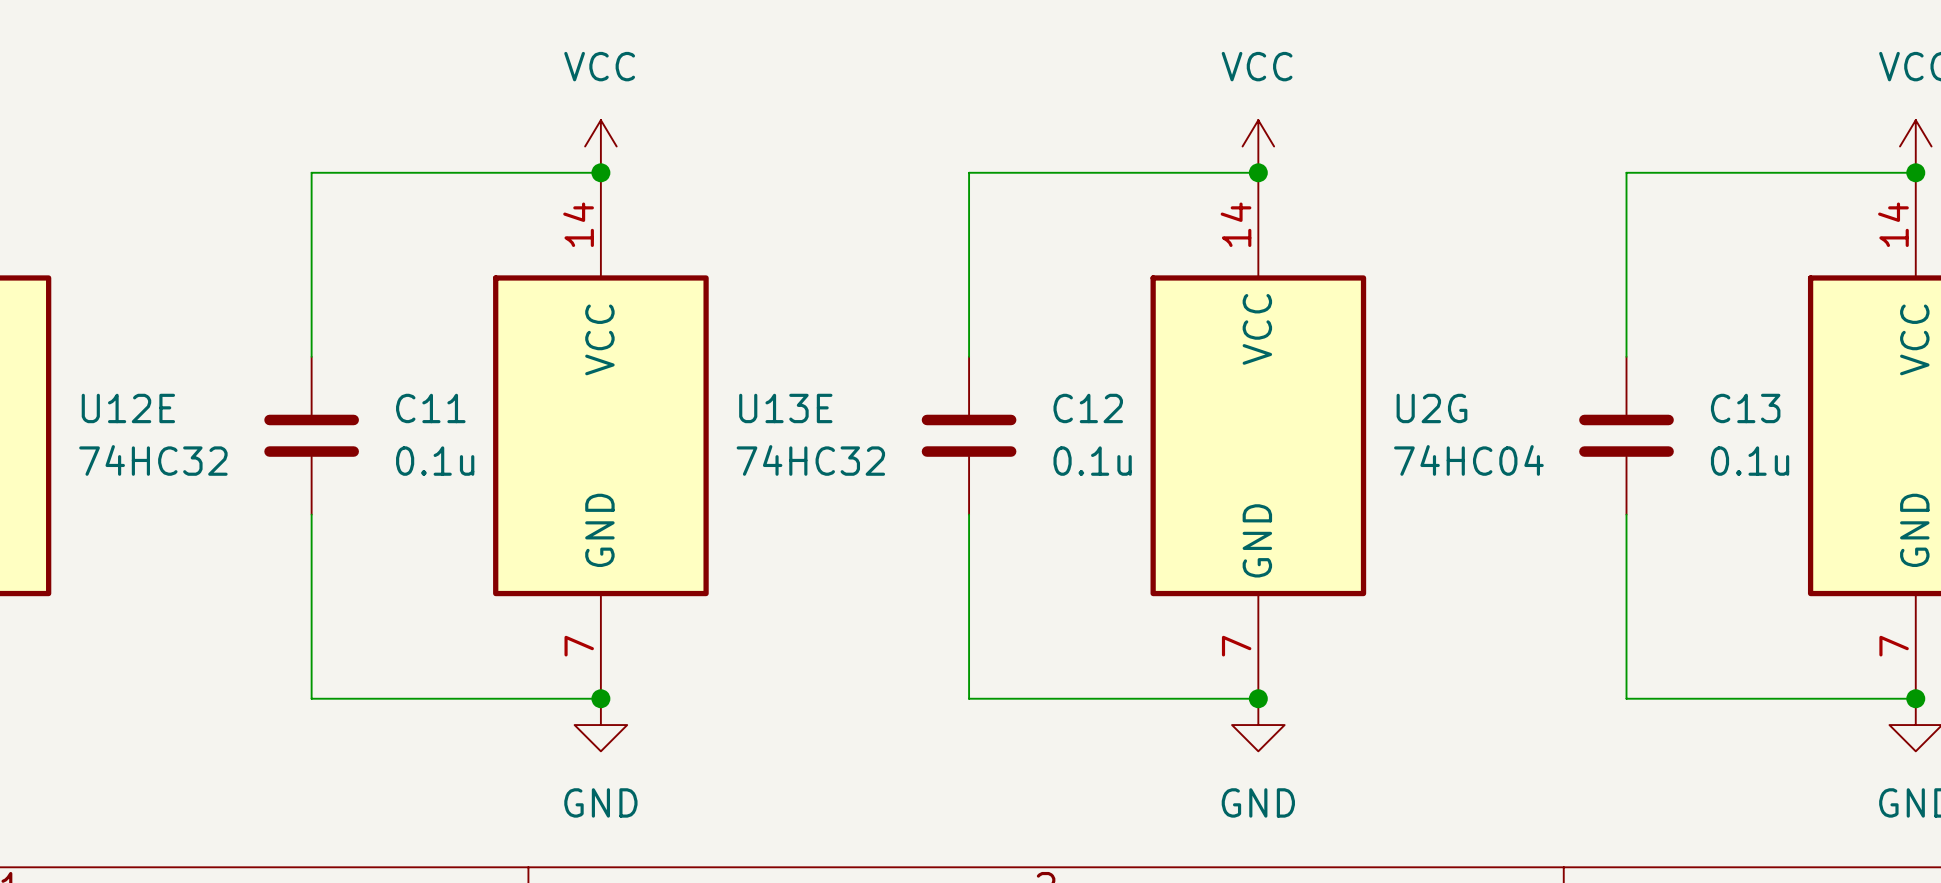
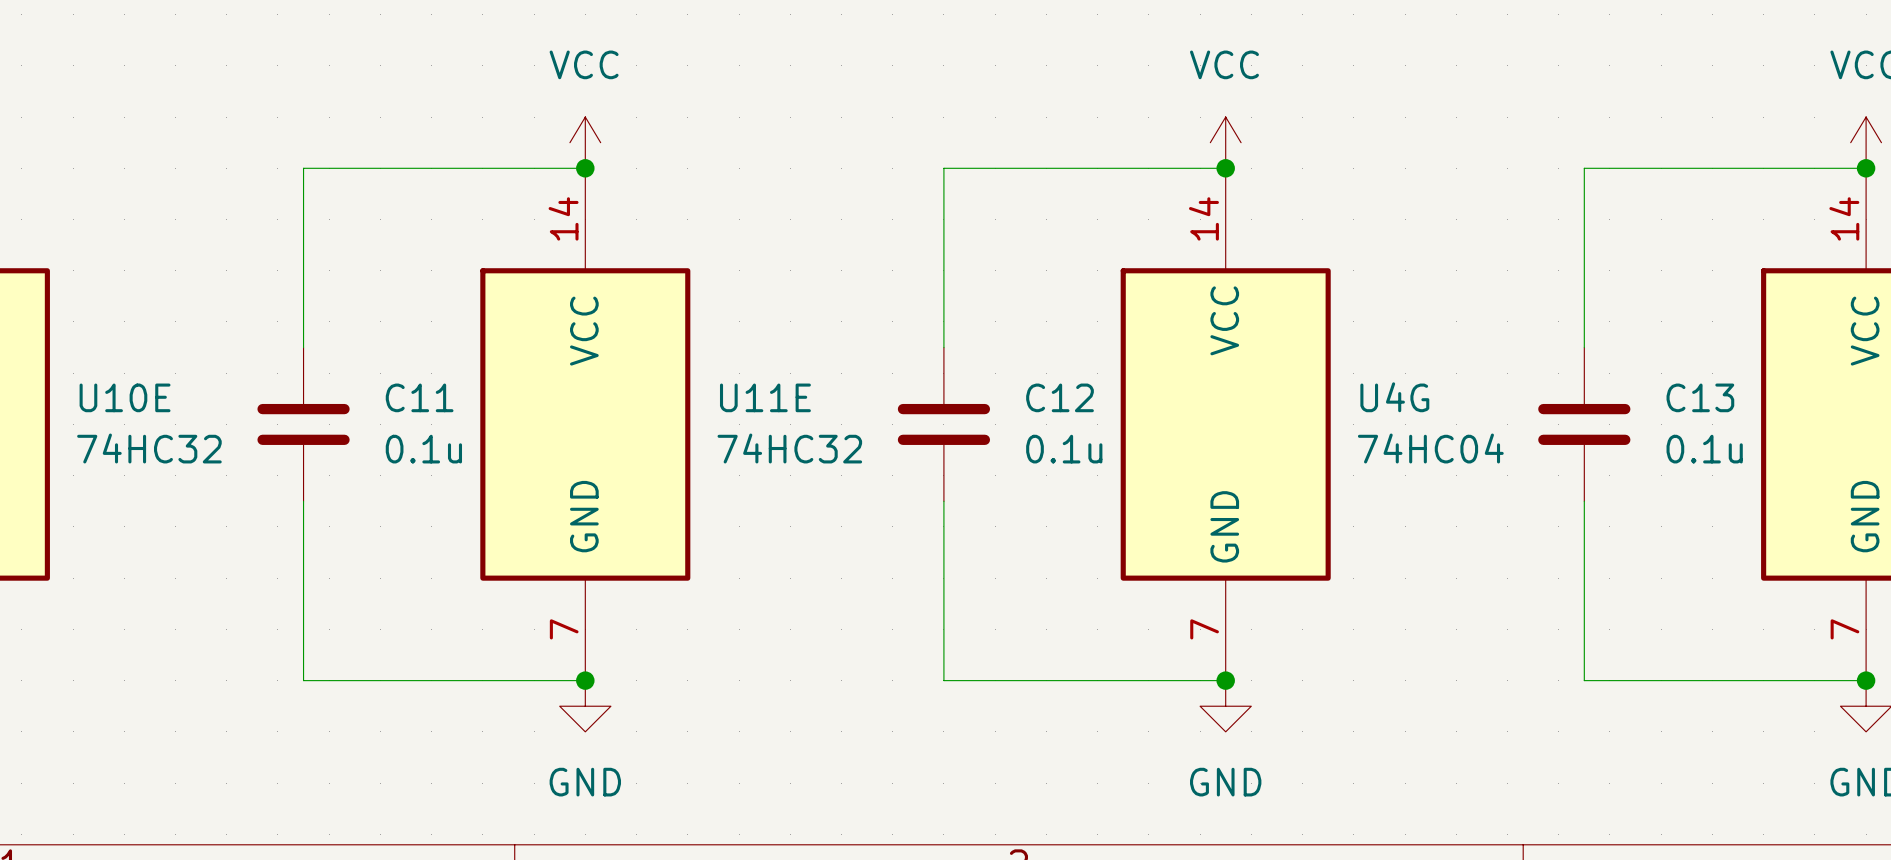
U12E name: U12E (128, 408) -> U10E (125, 397)
U13E name: U13E (785, 408) -> U11E (765, 397)
U2G name: U2G (1431, 408) -> U4G (1394, 397)

